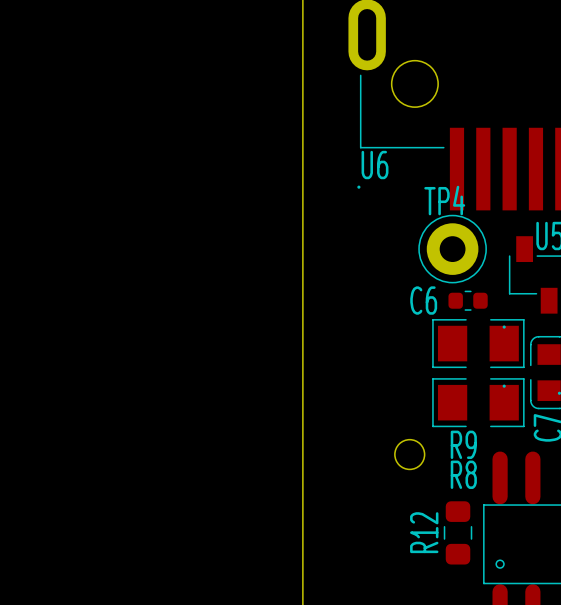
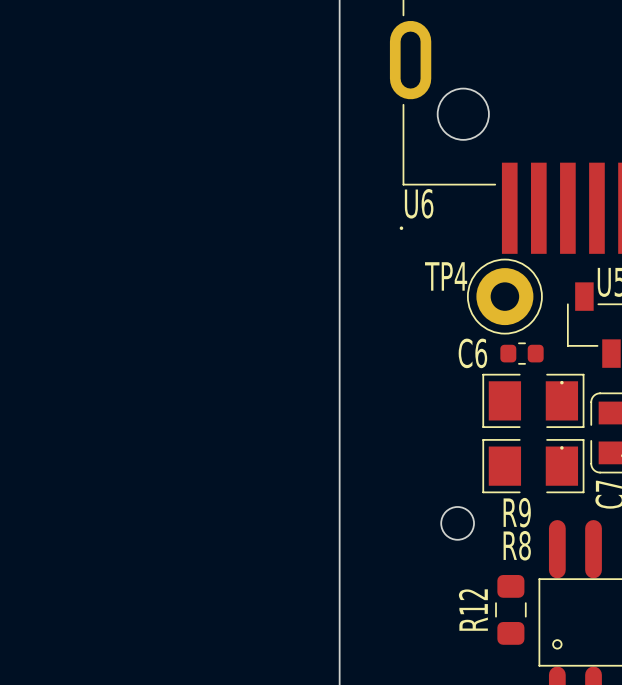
TP4 name position: TP4 (444, 200) -> TP4 (446, 276)

